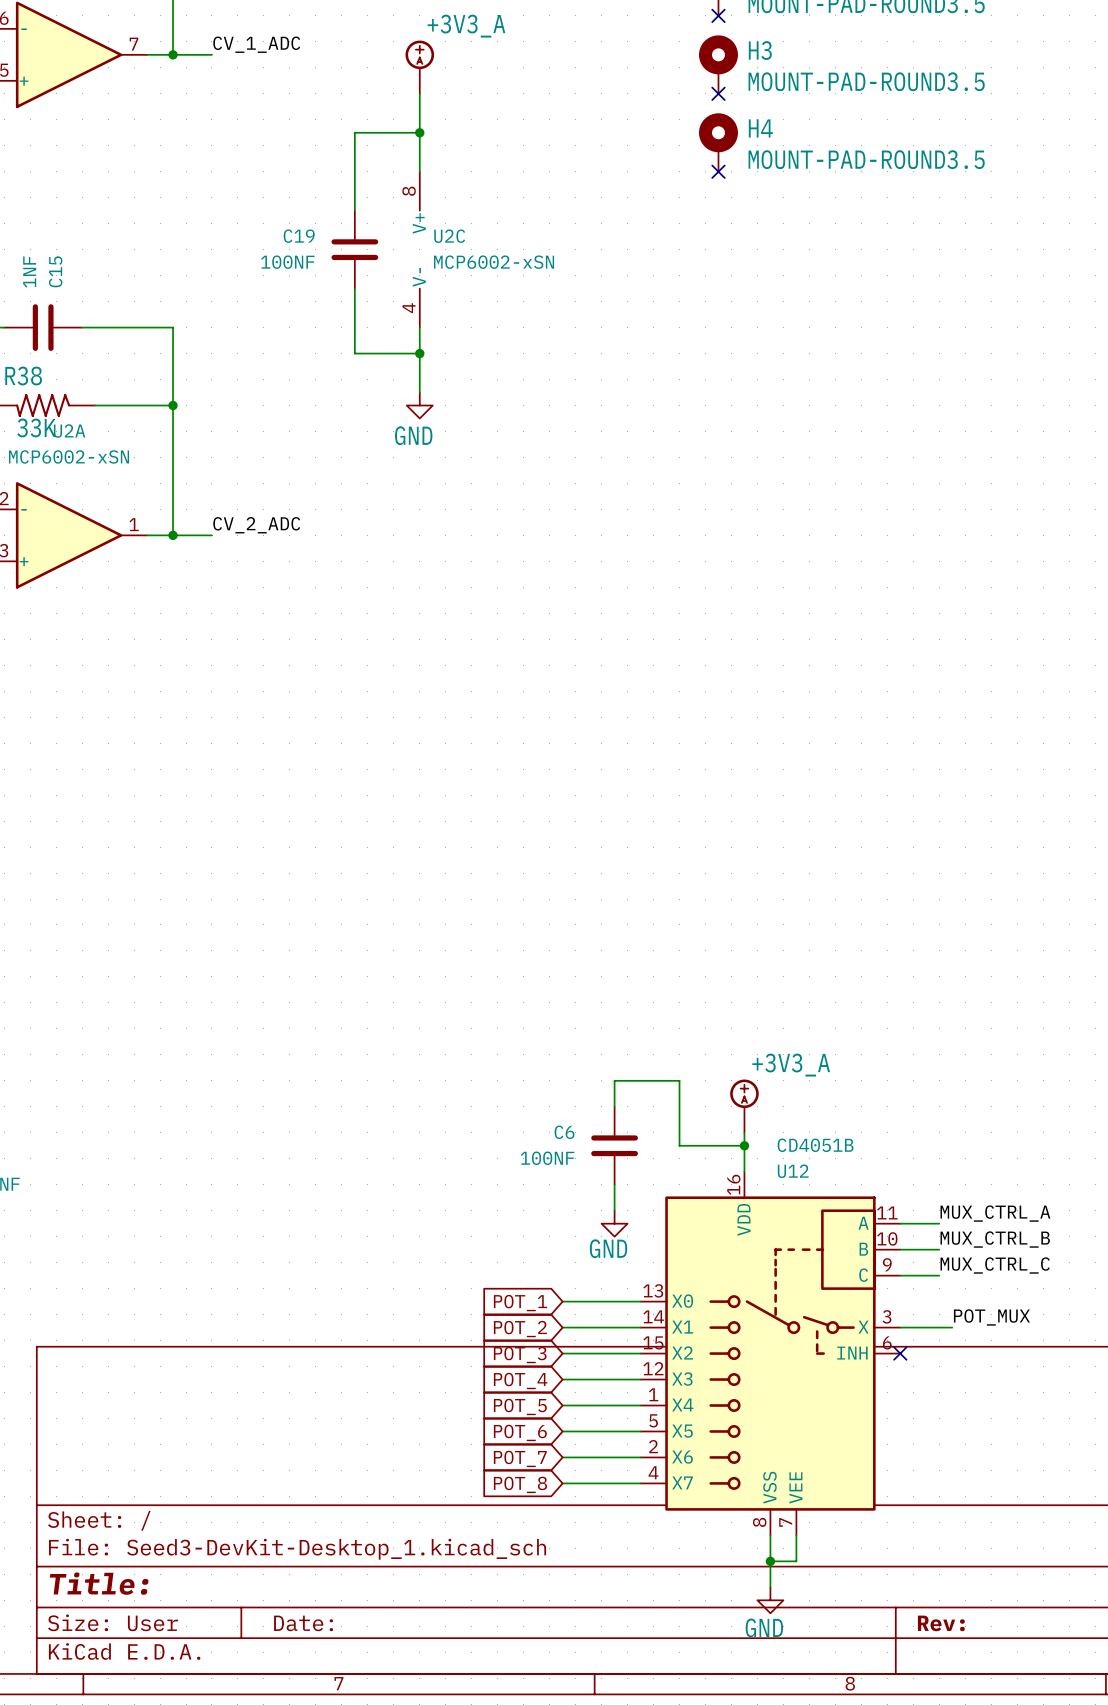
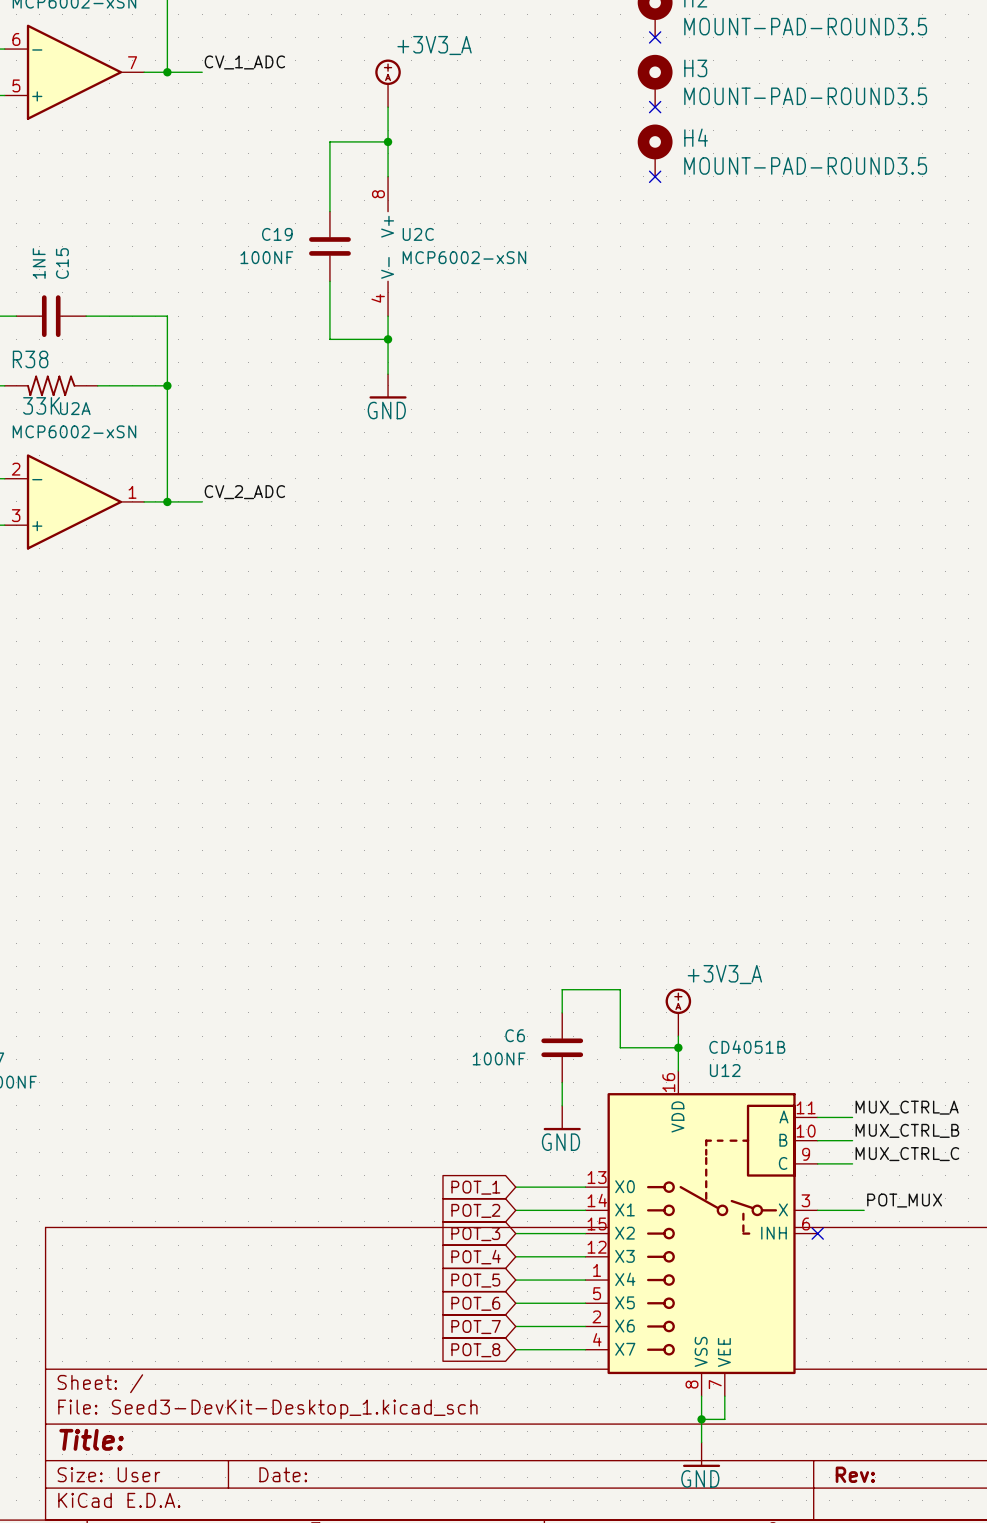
power symbol shape: [406, 392, 433, 419] -> [369, 374, 407, 399]
power symbol shape: [601, 1210, 628, 1237] -> [543, 1105, 581, 1131]
power symbol shape: [757, 1587, 784, 1614] -> [683, 1442, 721, 1468]

